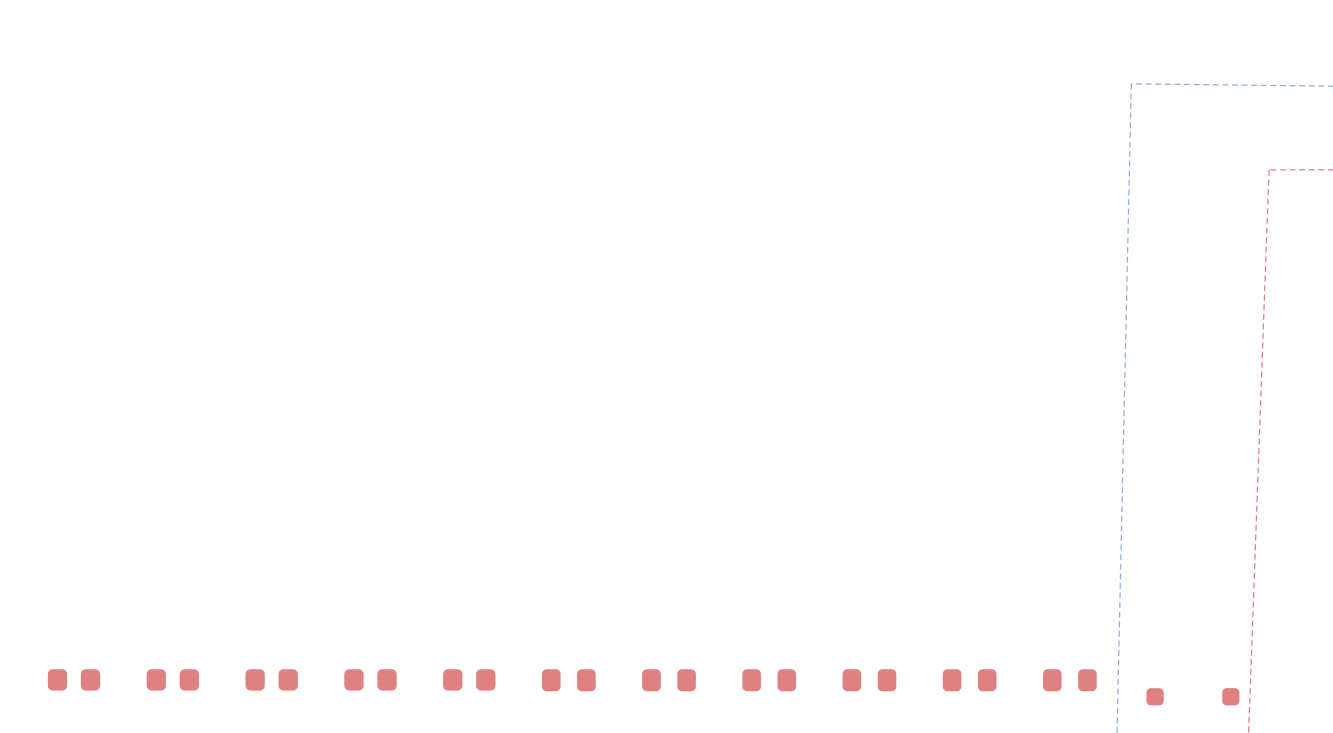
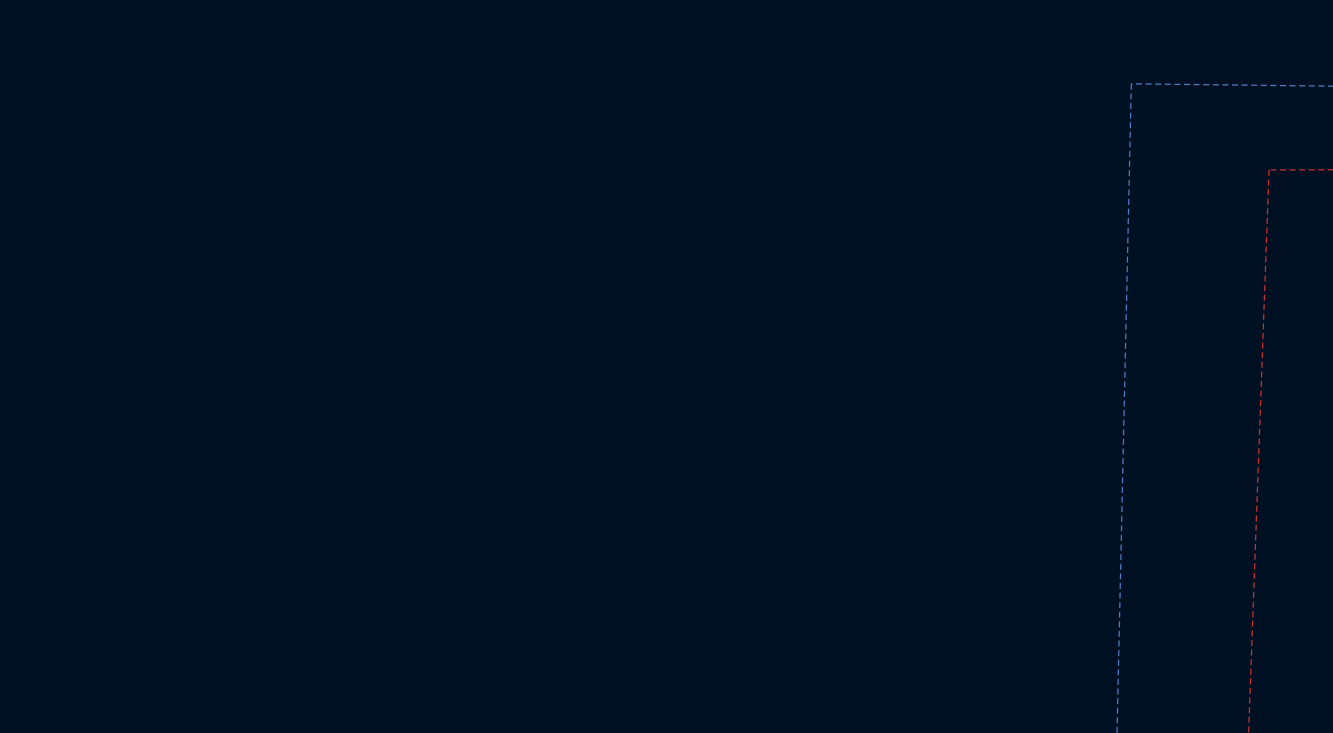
part: (73, 679) -> none
part: (172, 679) -> none
part: (271, 679) -> none
part: (370, 679) -> none
part: (469, 679) -> none
part: (568, 680) -> none
part: (669, 680) -> none
part: (769, 680) -> none
part: (869, 680) -> none
part: (969, 680) -> none
part: (1069, 680) -> none
part: (1192, 696) -> none

